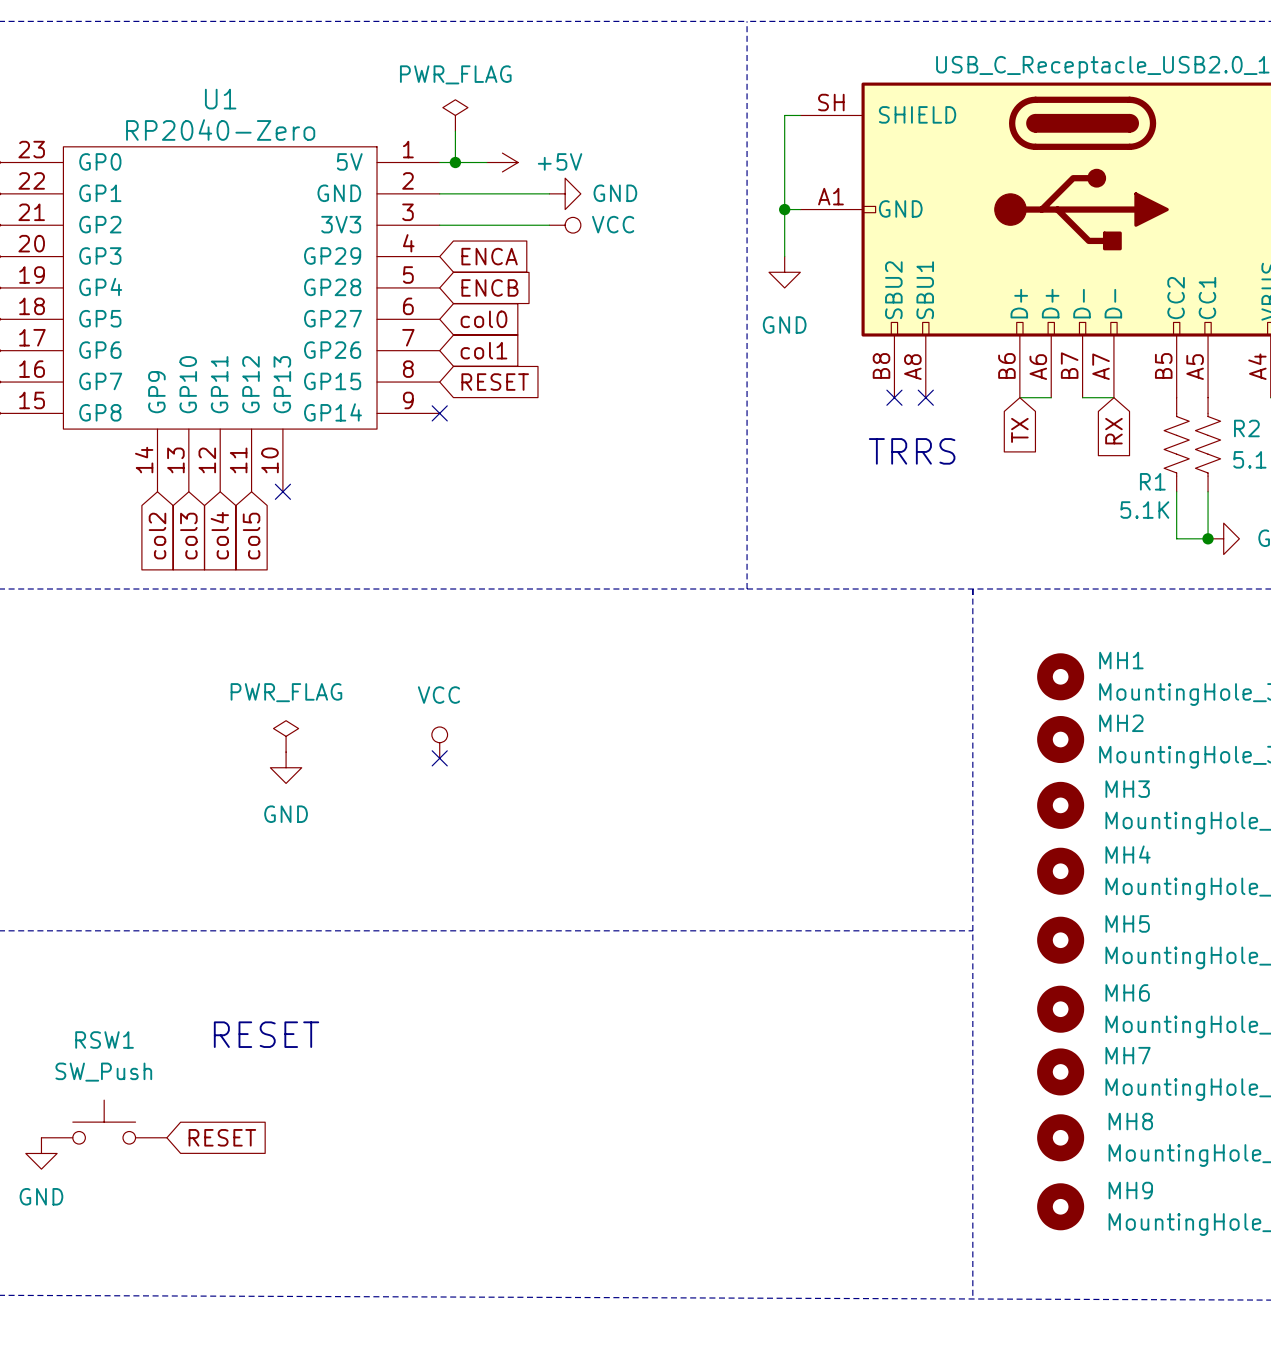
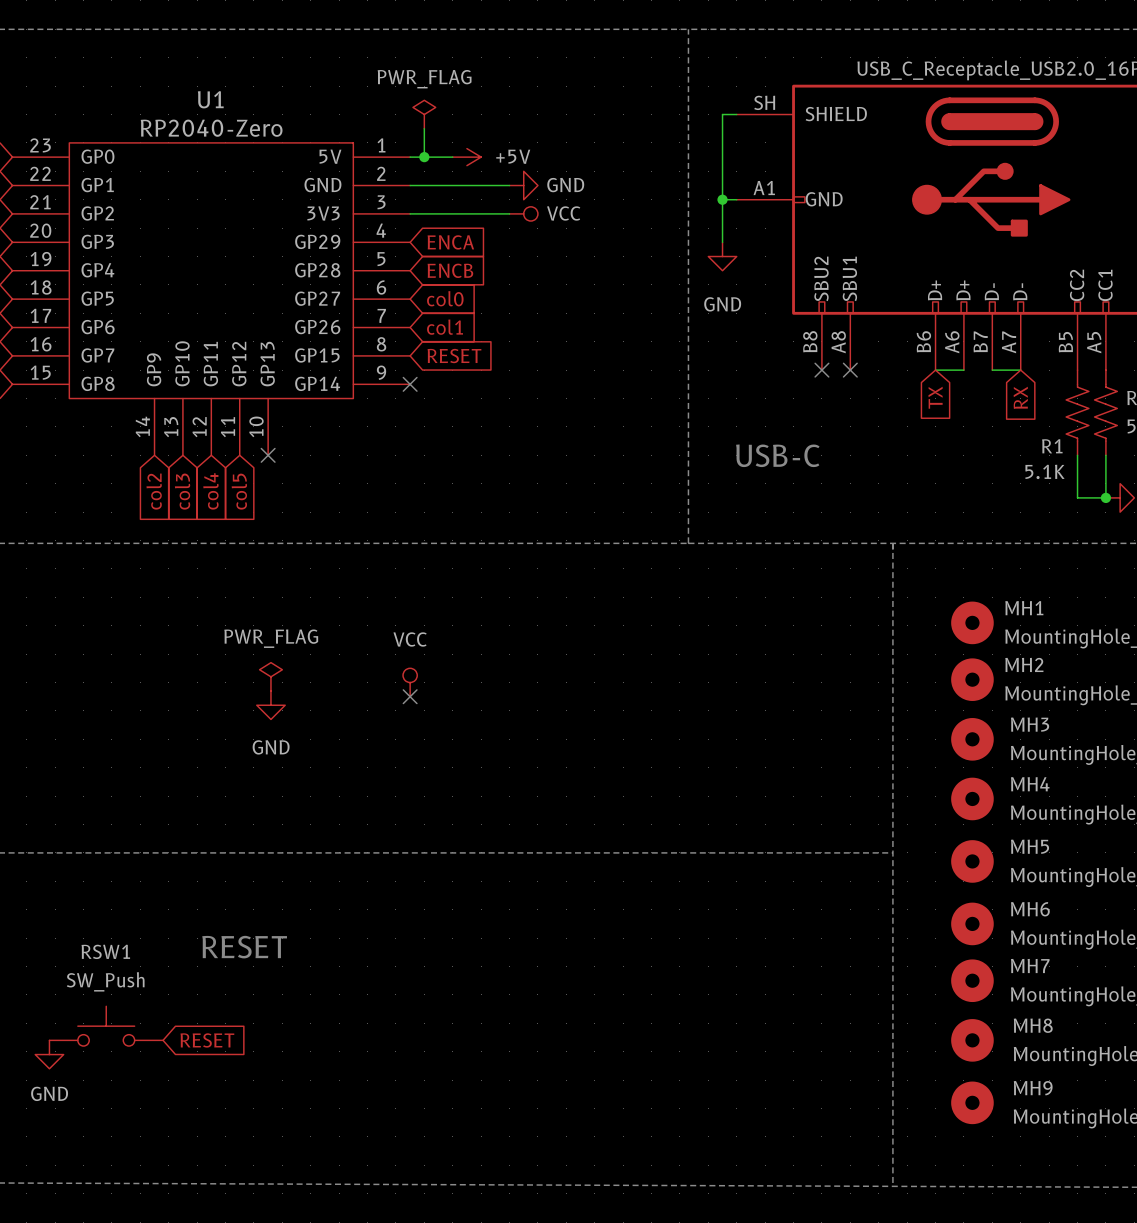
text: TRRS (912, 451) -> none
text: none -> USB-C (777, 455)

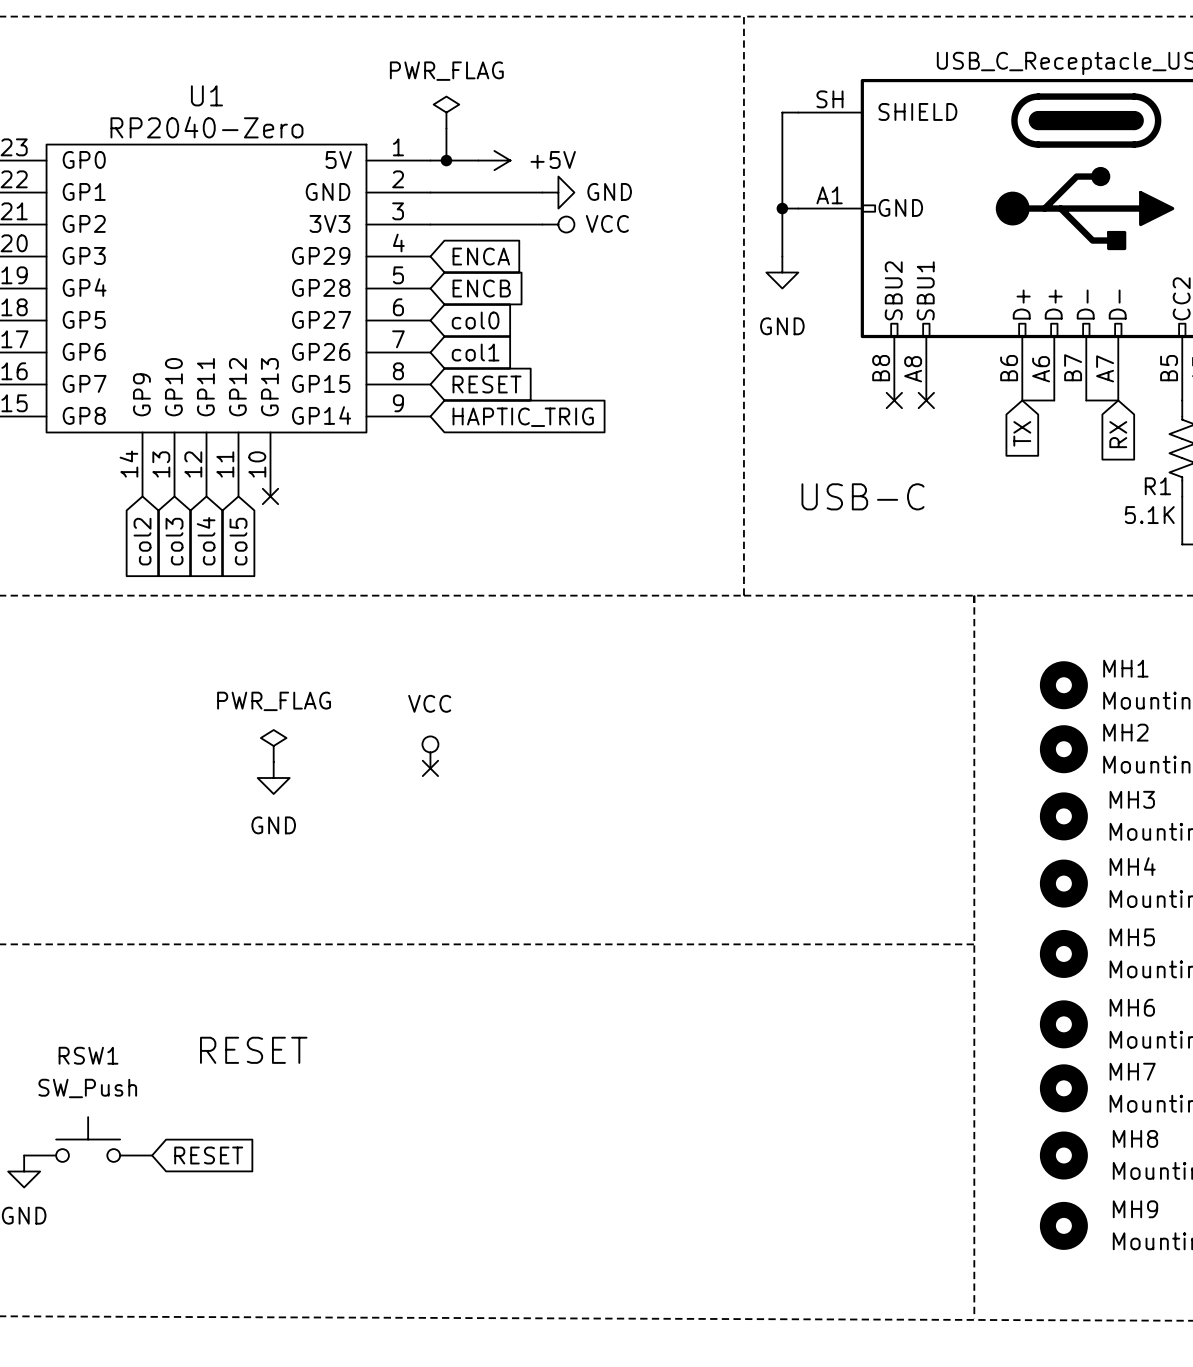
no-connect mark: (410, 384) -> none
global label: none -> HAPTIC_TRIG (523, 417)

